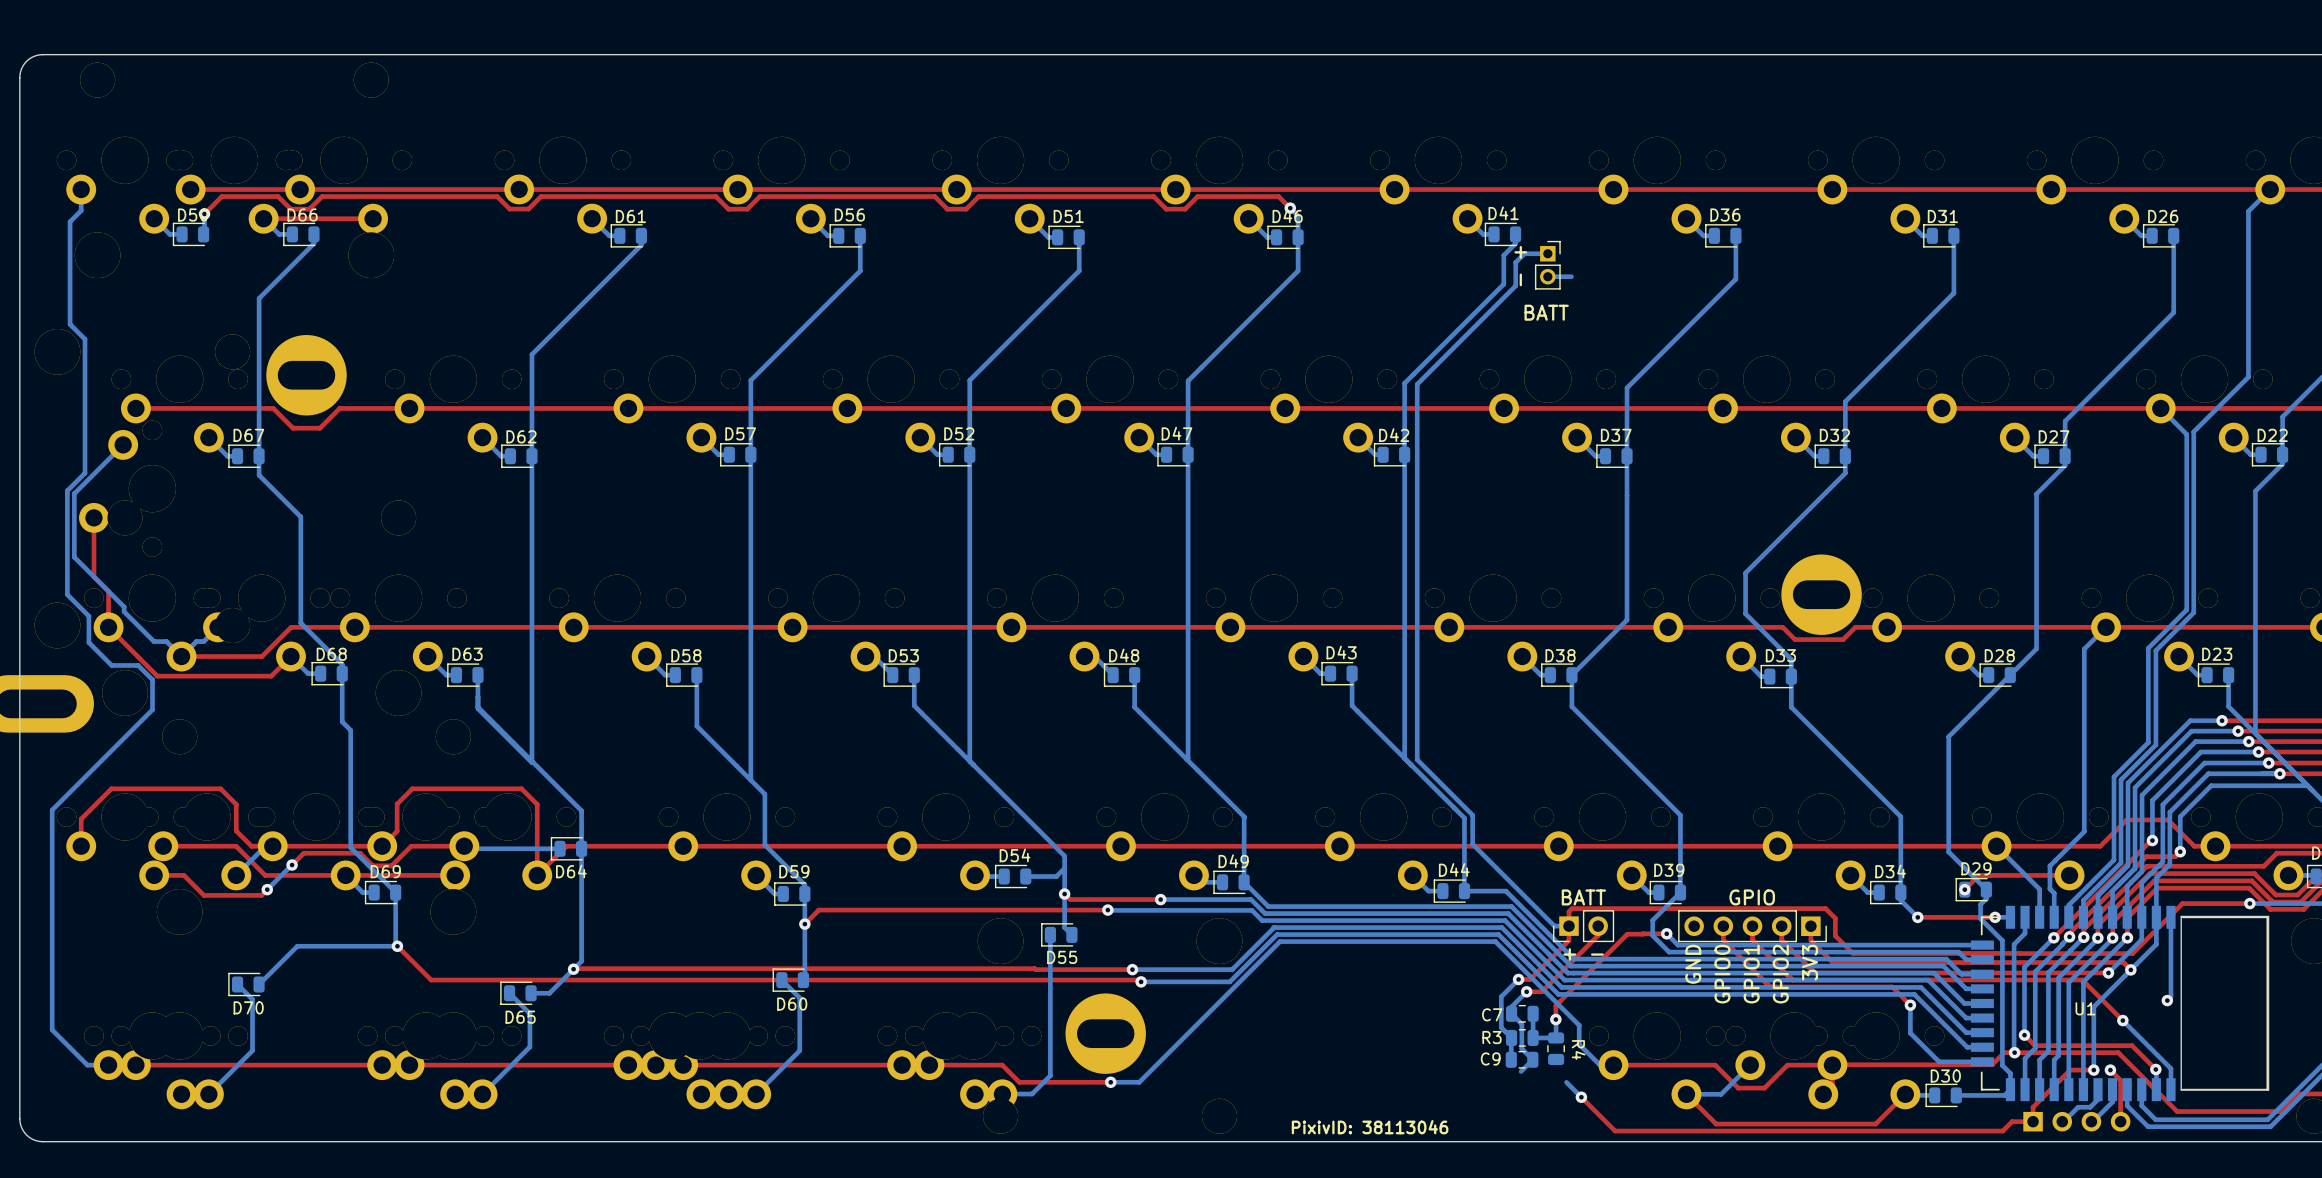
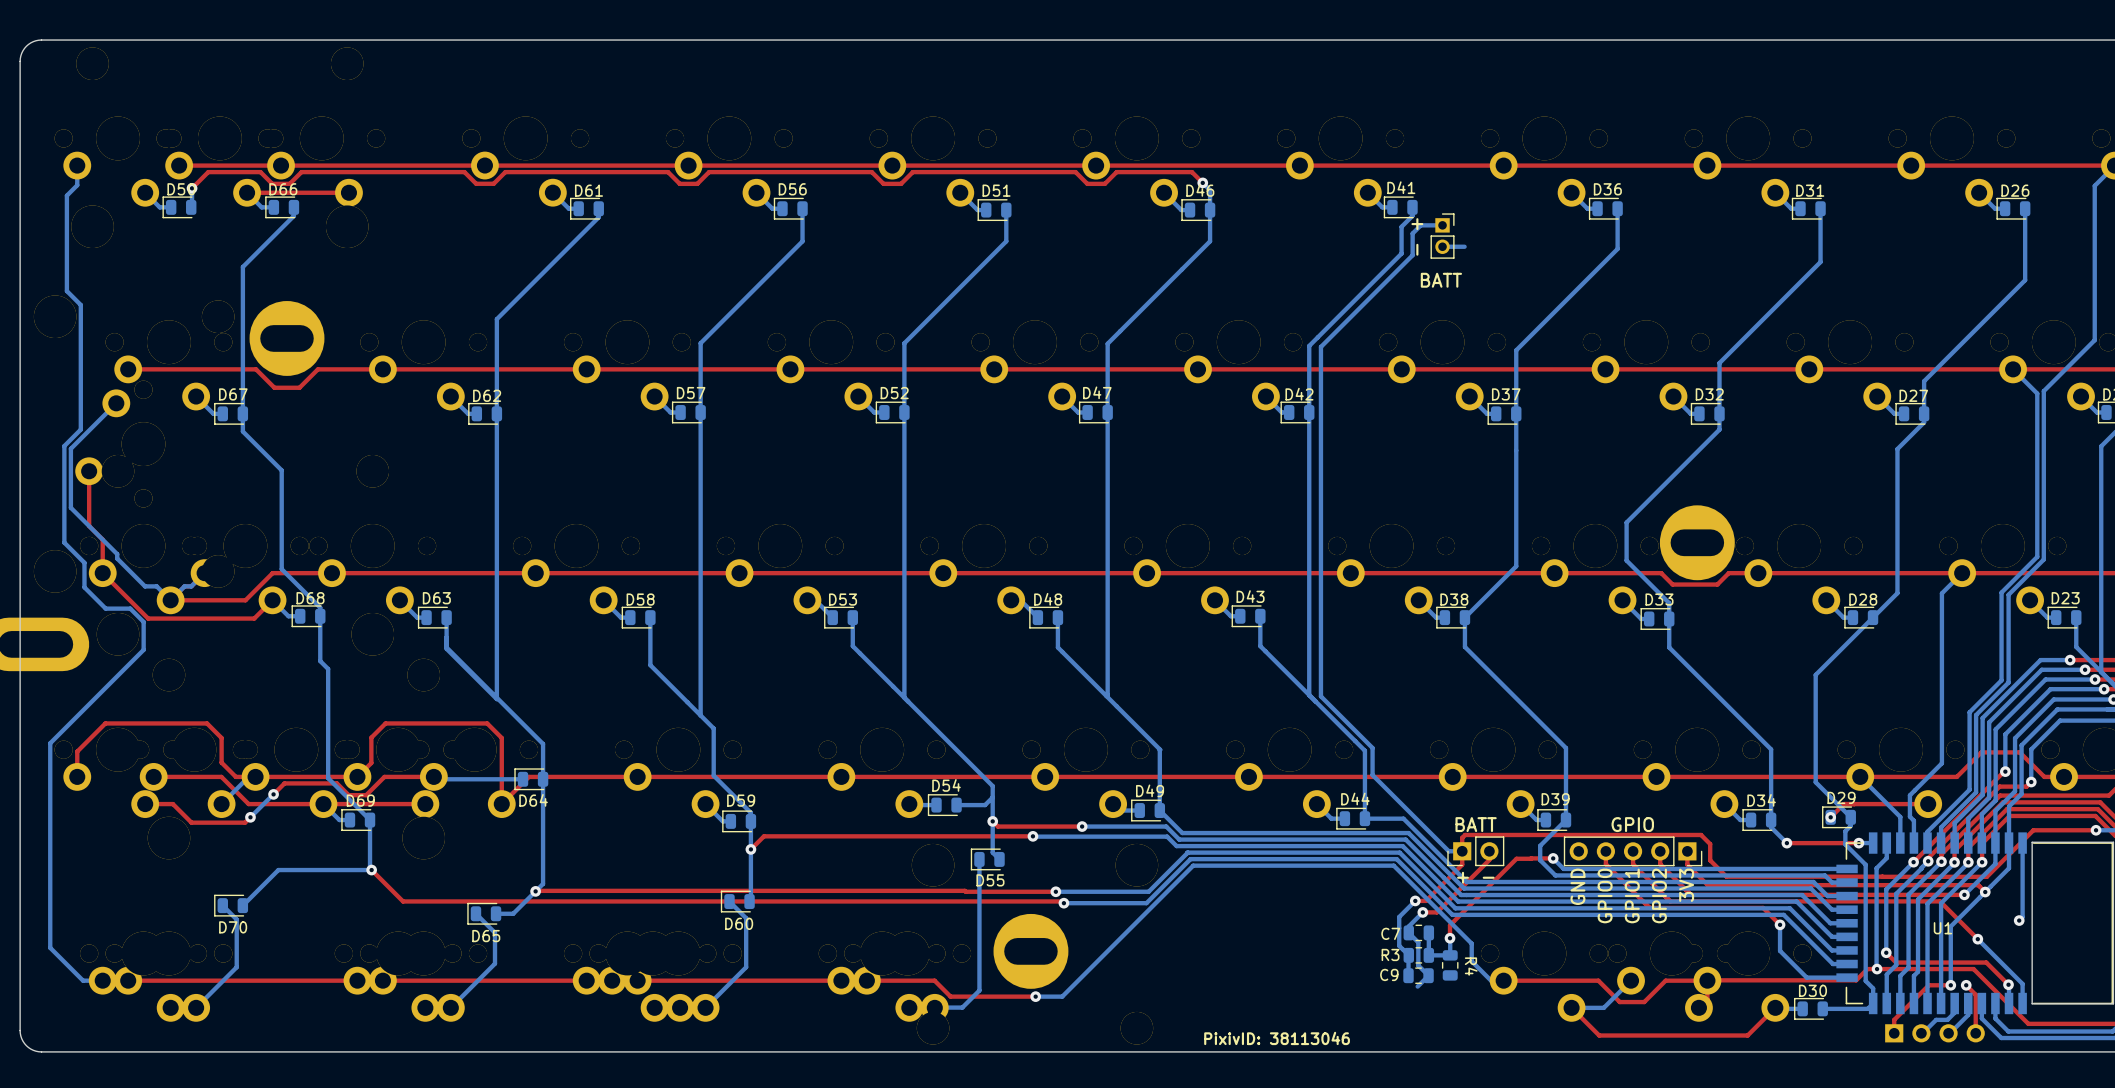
bottom track: (1566, 1082) (1581, 1097) -> none
top track: (1581, 1097) (1615, 1131) (2002, 1131) (2012, 1121) (2033, 1121) -> none
via: (1581, 1097) -> none

